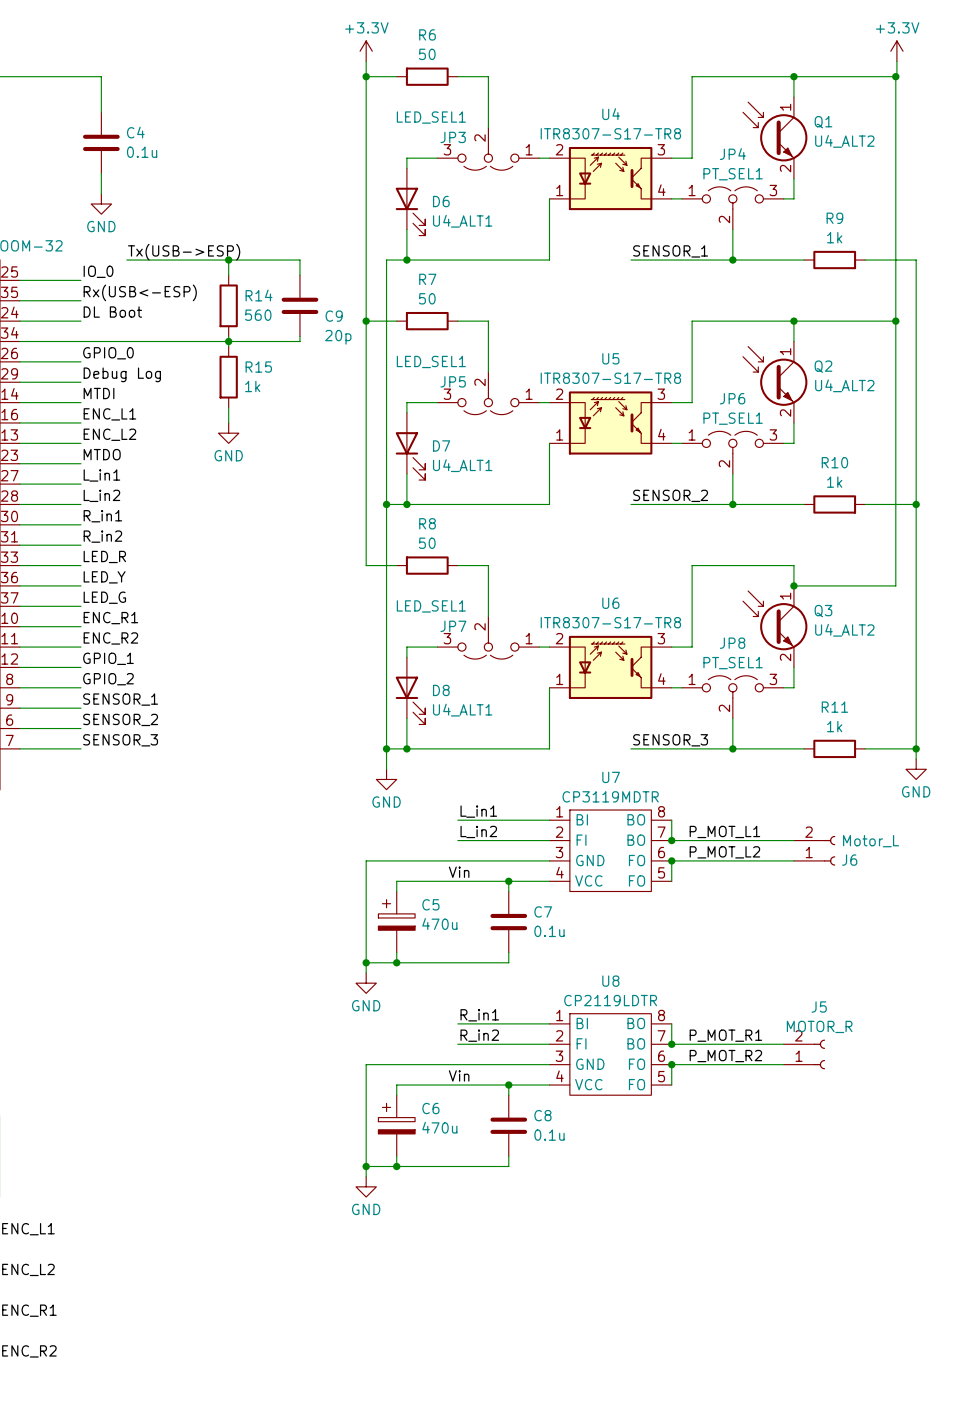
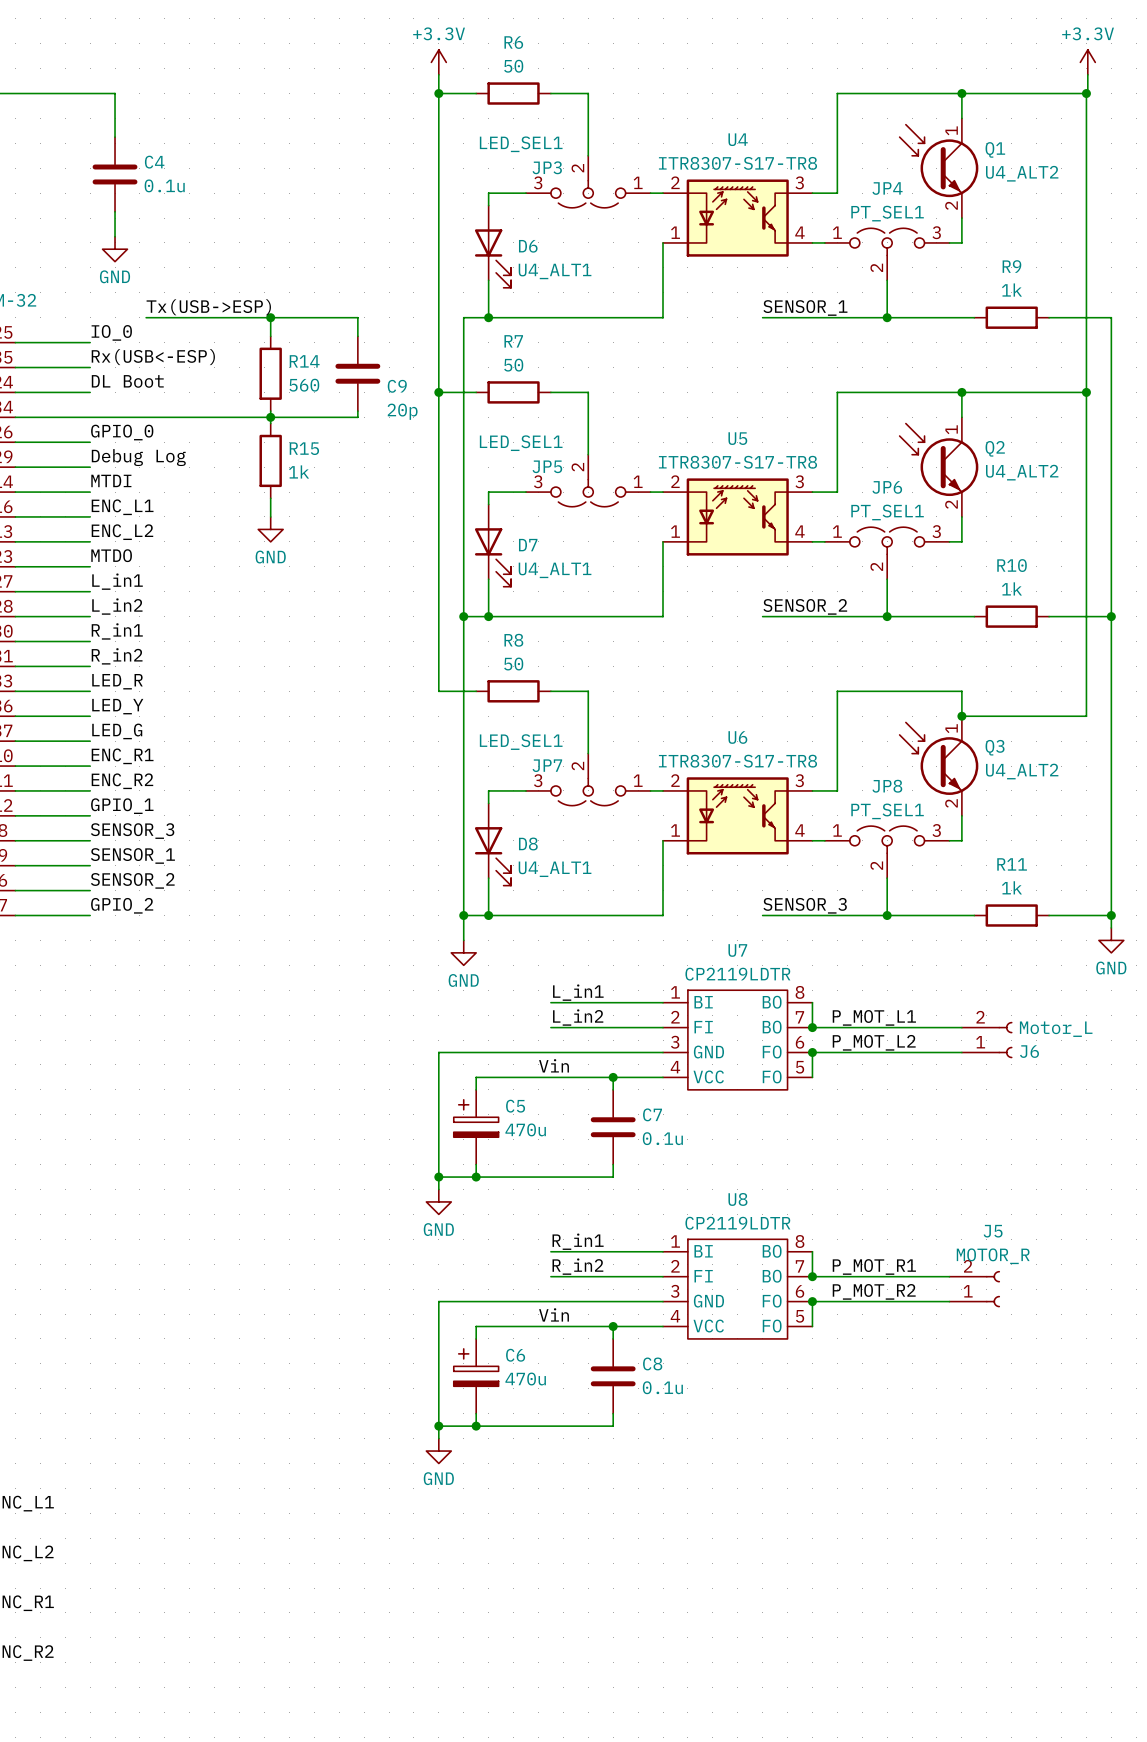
label: GPIO_2 (108, 679) -> SENSOR_3 (132, 831)
label: SENSOR_3 (120, 740) -> GPIO_2 (122, 905)
U7 value: CP3119MDTR (610, 796) -> CP2119LDTR (737, 974)

